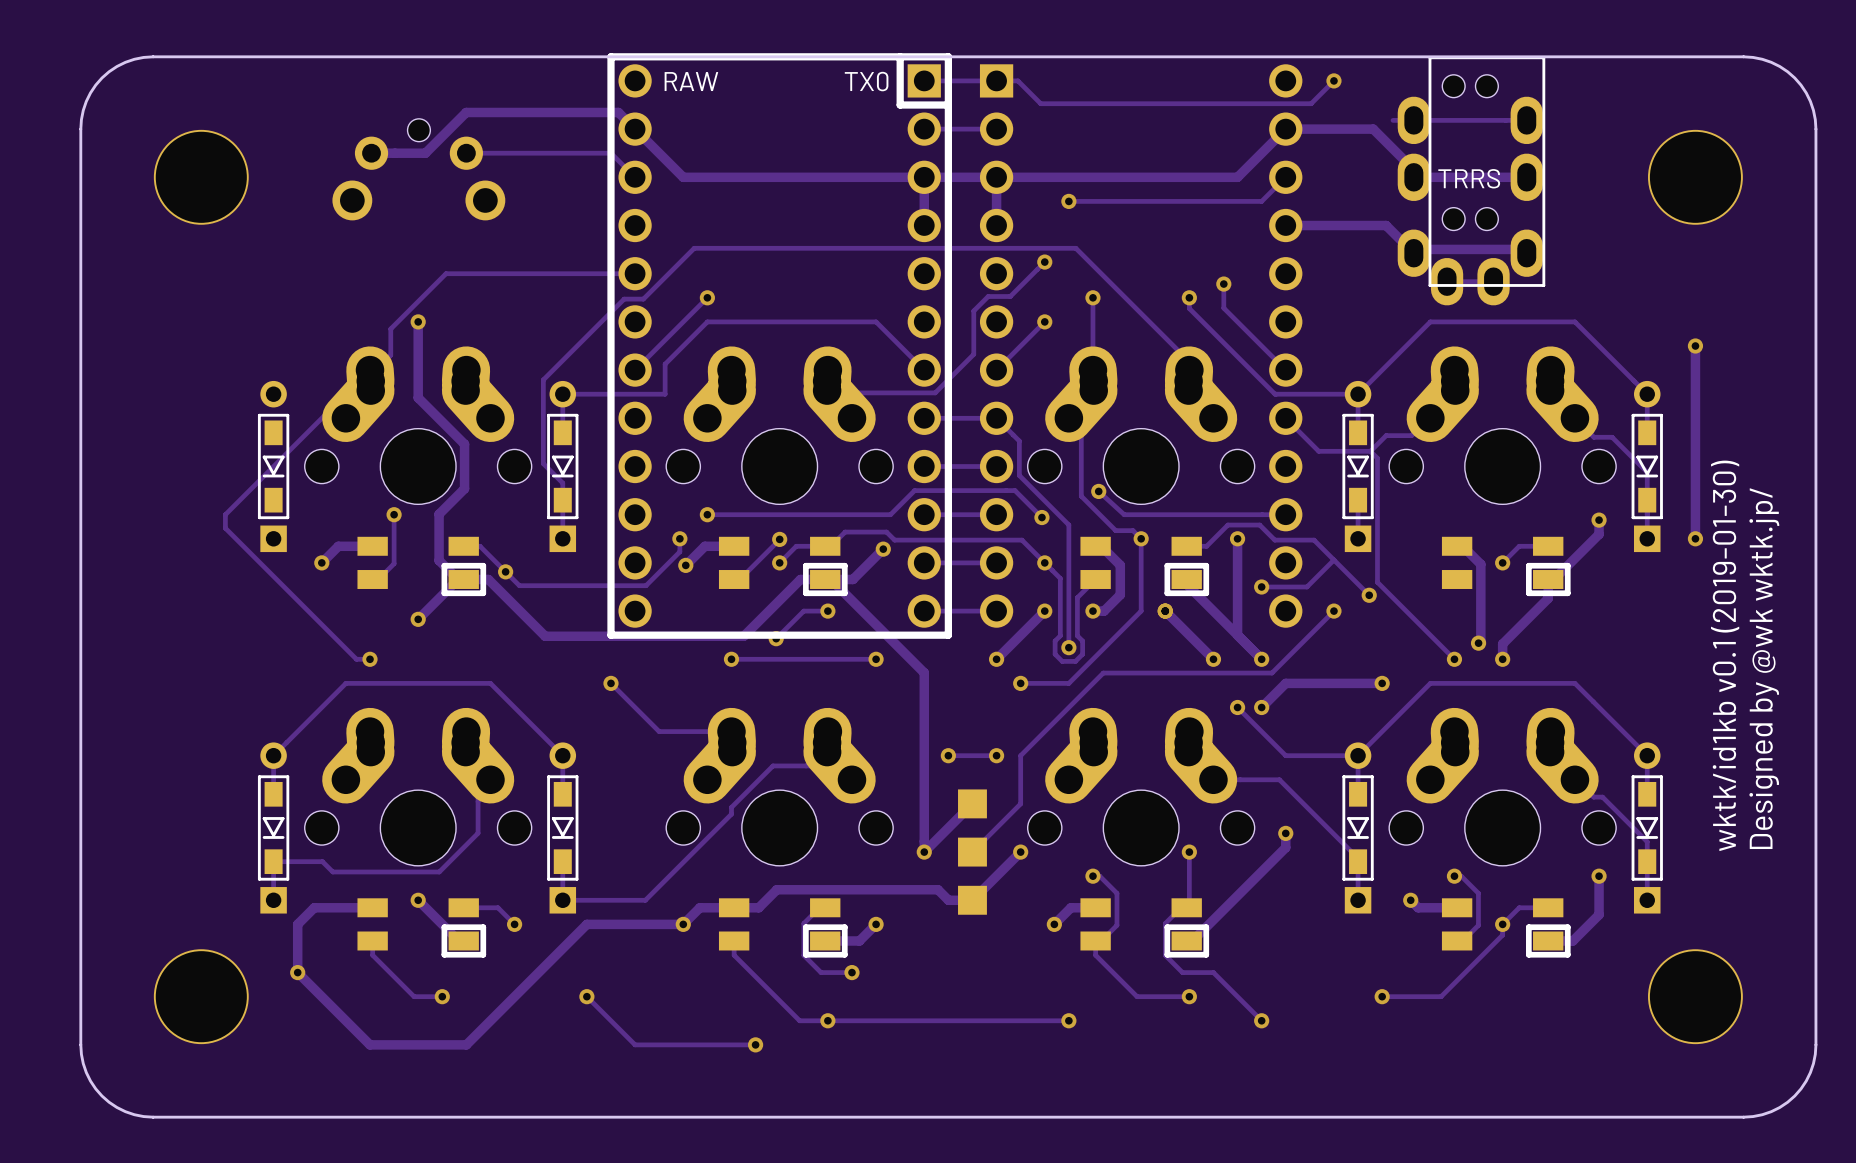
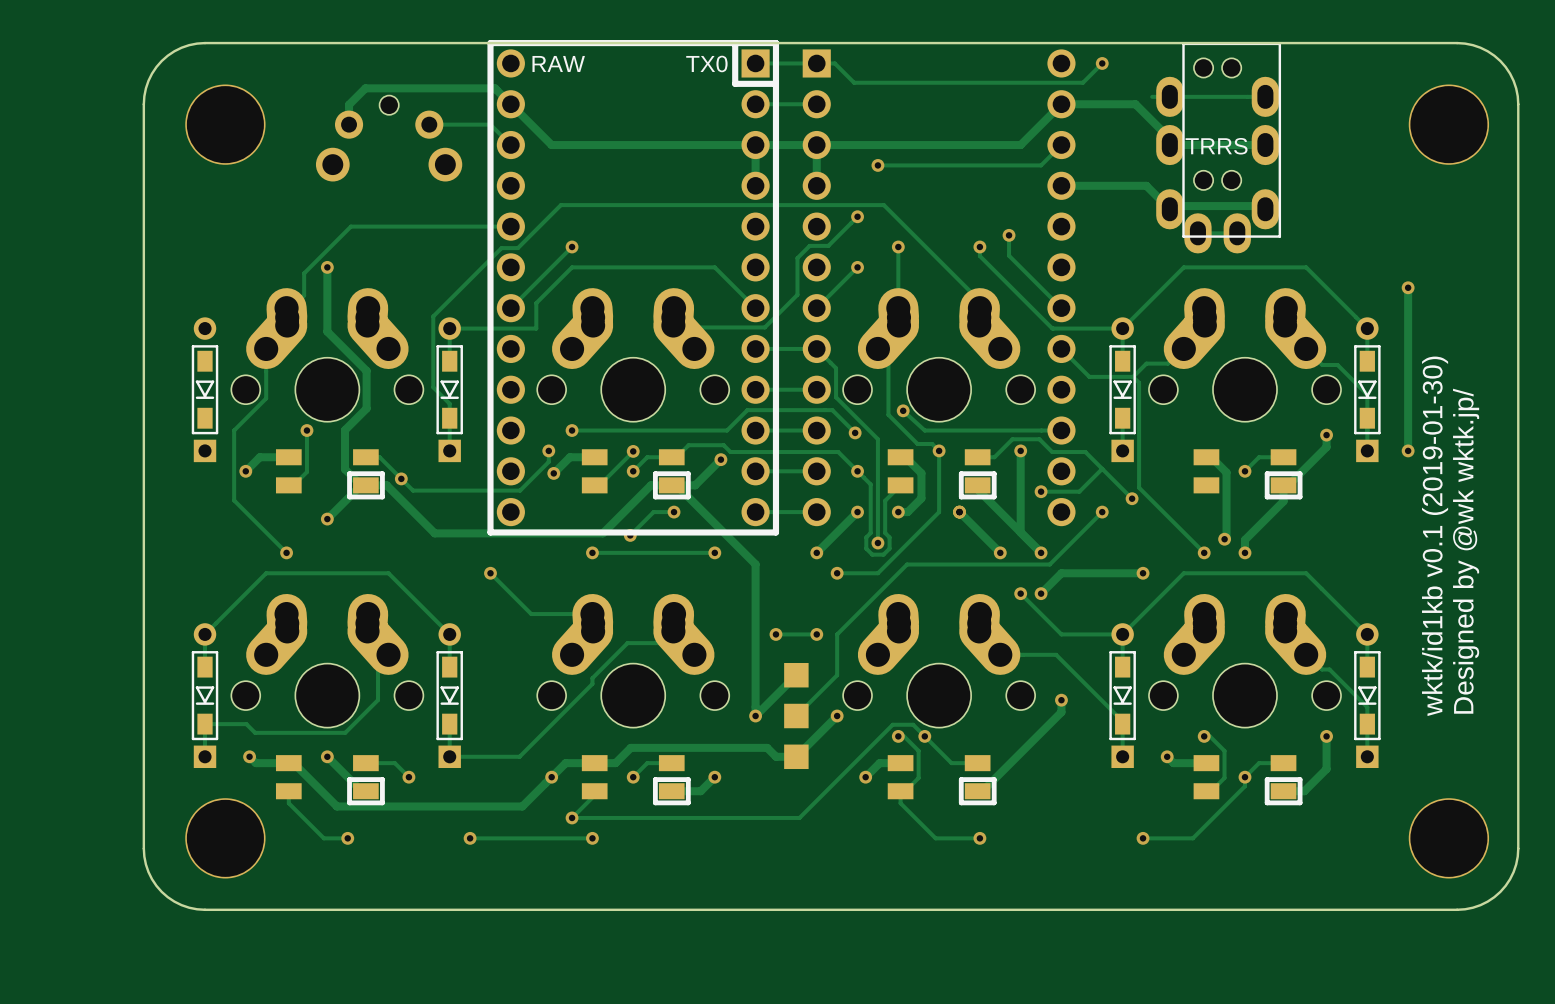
board edge: (273, 56) (153, 56) (134, 59) (109, 71) (95, 85) (86, 101) (81, 119) (80, 1044) (86, 1072) (101, 1096) (116, 1107) (143, 1116) (1743, 1117) (1762, 1114) (1779, 1107) (1794, 1096) (1806, 1081) (1813, 1063) (1815, 1044) (1815, 129) (1810, 101) (1794, 77) (1771, 62) (1743, 56) -> (205, 43) (181, 47) (161, 60) (148, 80) (143, 104) (143, 848) (148, 872) (156, 885) (167, 897) (189, 907) (205, 909) (1457, 909) (1480, 905) (1500, 891) (1510, 879) (1517, 856) (1518, 104) (1513, 80) (1500, 60) (1480, 47) (1465, 43) (1448, 43)
track: (618, 112) (466, 112) (425, 153) (371, 153) -> (496, 90) (494, 88) (365, 88) (349, 104) (349, 124)
track: (466, 153) (538, 153) -> none
part position: (418, 169) -> (389, 138)
part position: (201, 177) -> (225, 124)
part position: (1695, 177) -> (1448, 124)
track: (370, 370) (225, 514) (225, 528) (356, 659) (370, 659) -> (266, 348) (266, 398) (234, 430) (234, 500) (286, 552)
track: (1189, 852) (1189, 905) (1186, 907) -> none
via position: (1189, 852) -> (924, 736)
track: (333, 907) (314, 907) (297, 924) (297, 972) (370, 1044) (466, 1044) (586, 924) (683, 924) -> (288, 763) (293, 763) (336, 806) (522, 806) (551, 777)
track: (819, 907) (803, 923) (803, 955) (821, 972) -> (666, 763) (647, 763) (633, 777)
track: (1181, 907) (1165, 923) (1165, 955) (1182, 972) (1213, 972) (1261, 1020) -> (972, 763) (951, 763) (913, 724) (892, 724) (799, 817) (694, 817)
via: none -> (633, 777)
track: (734, 945) (734, 955) (799, 1020) (1068, 1020) -> (594, 795) (572, 817) (668, 817)
via position: (297, 972) -> (249, 756)
via: none -> (572, 817)
via: (851, 972) -> none
part position: (201, 996) -> (225, 838)
track: (586, 996) (635, 1044) (755, 1044) -> (470, 838) (592, 838)
via: none -> (592, 838)
part position: (1695, 996) -> (1448, 838)
via: (827, 1020) -> none
via: (1068, 1020) -> none
via: (1261, 1020) -> none
via: (755, 1044) -> none

